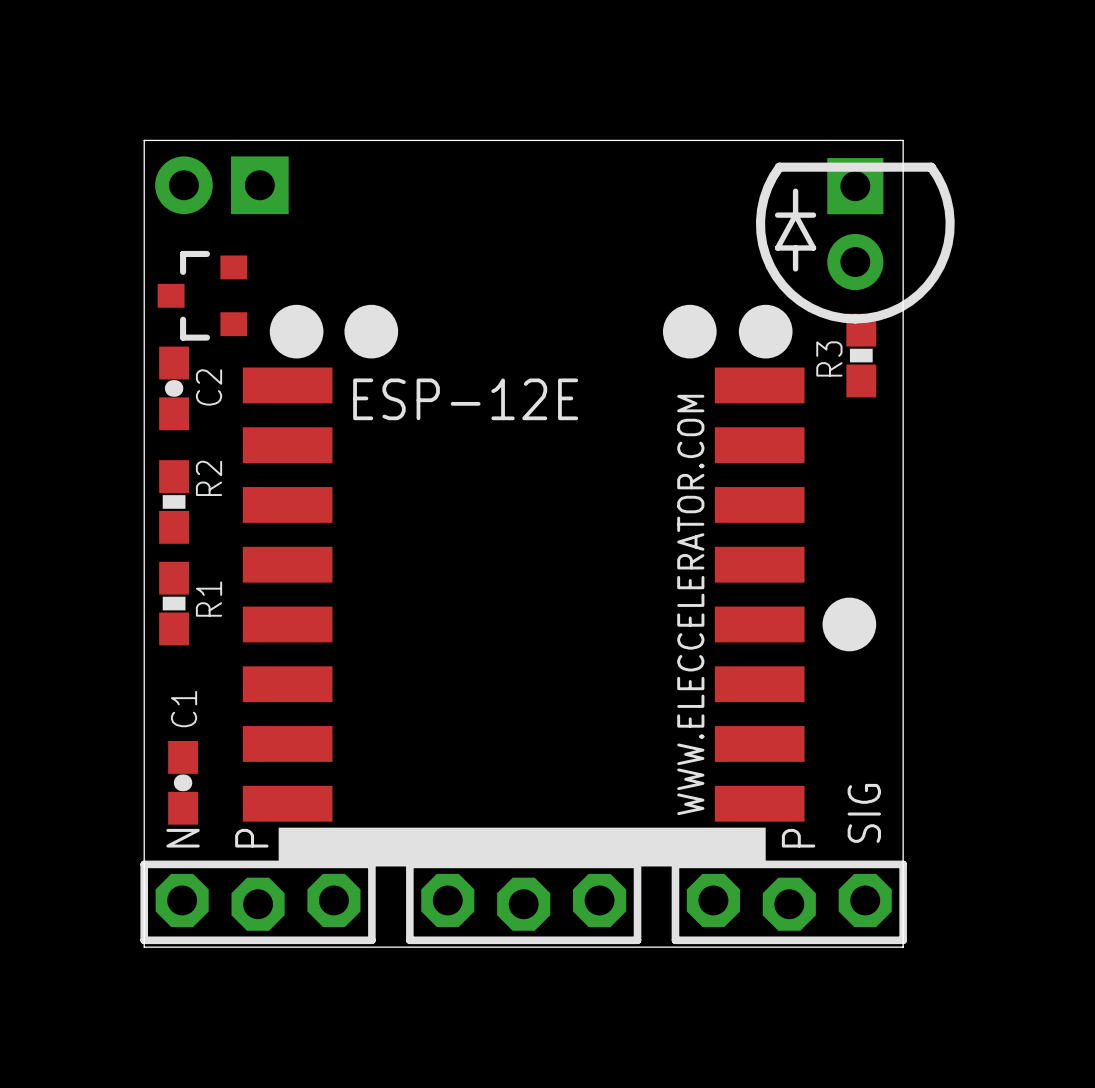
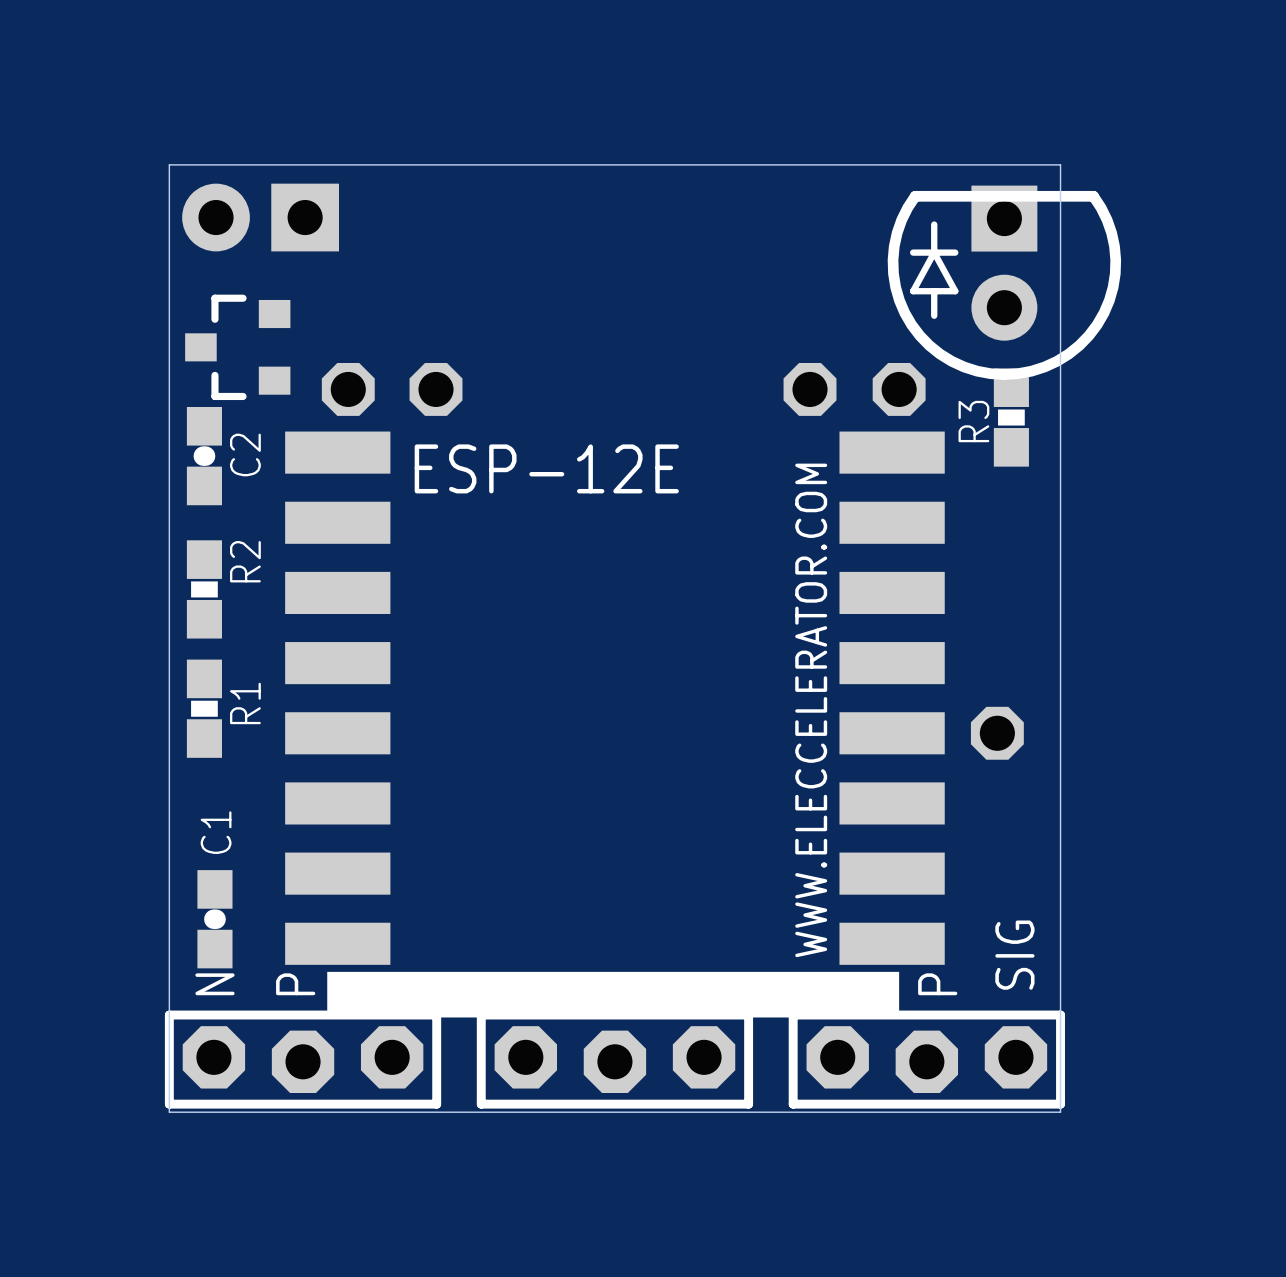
part footprint: [269, 304, 324, 359] -> [321, 362, 375, 416]
part footprint: [344, 304, 399, 359] -> [409, 362, 463, 416]
part footprint: [662, 304, 717, 359] -> [783, 362, 837, 416]
part footprint: [738, 304, 793, 359] -> [872, 362, 926, 416]
part footprint: [822, 597, 877, 652] -> [970, 706, 1024, 760]

